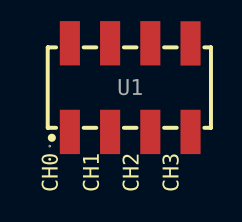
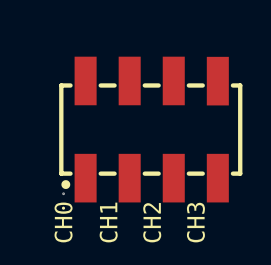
U1 name: U1 (130, 87) -> none

